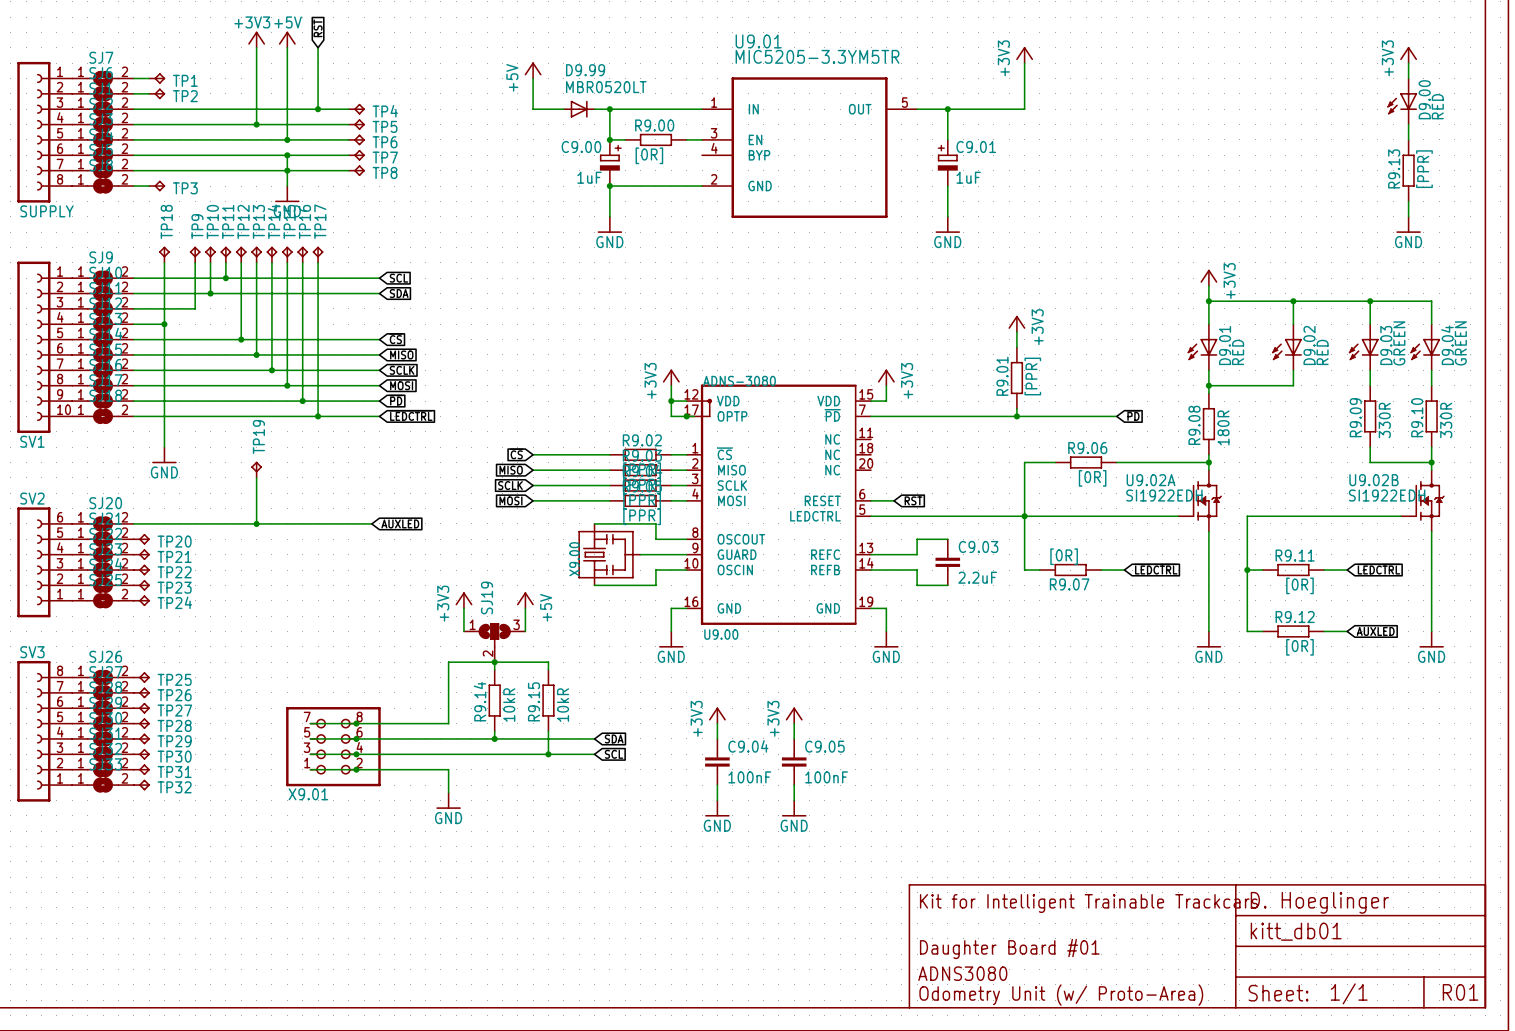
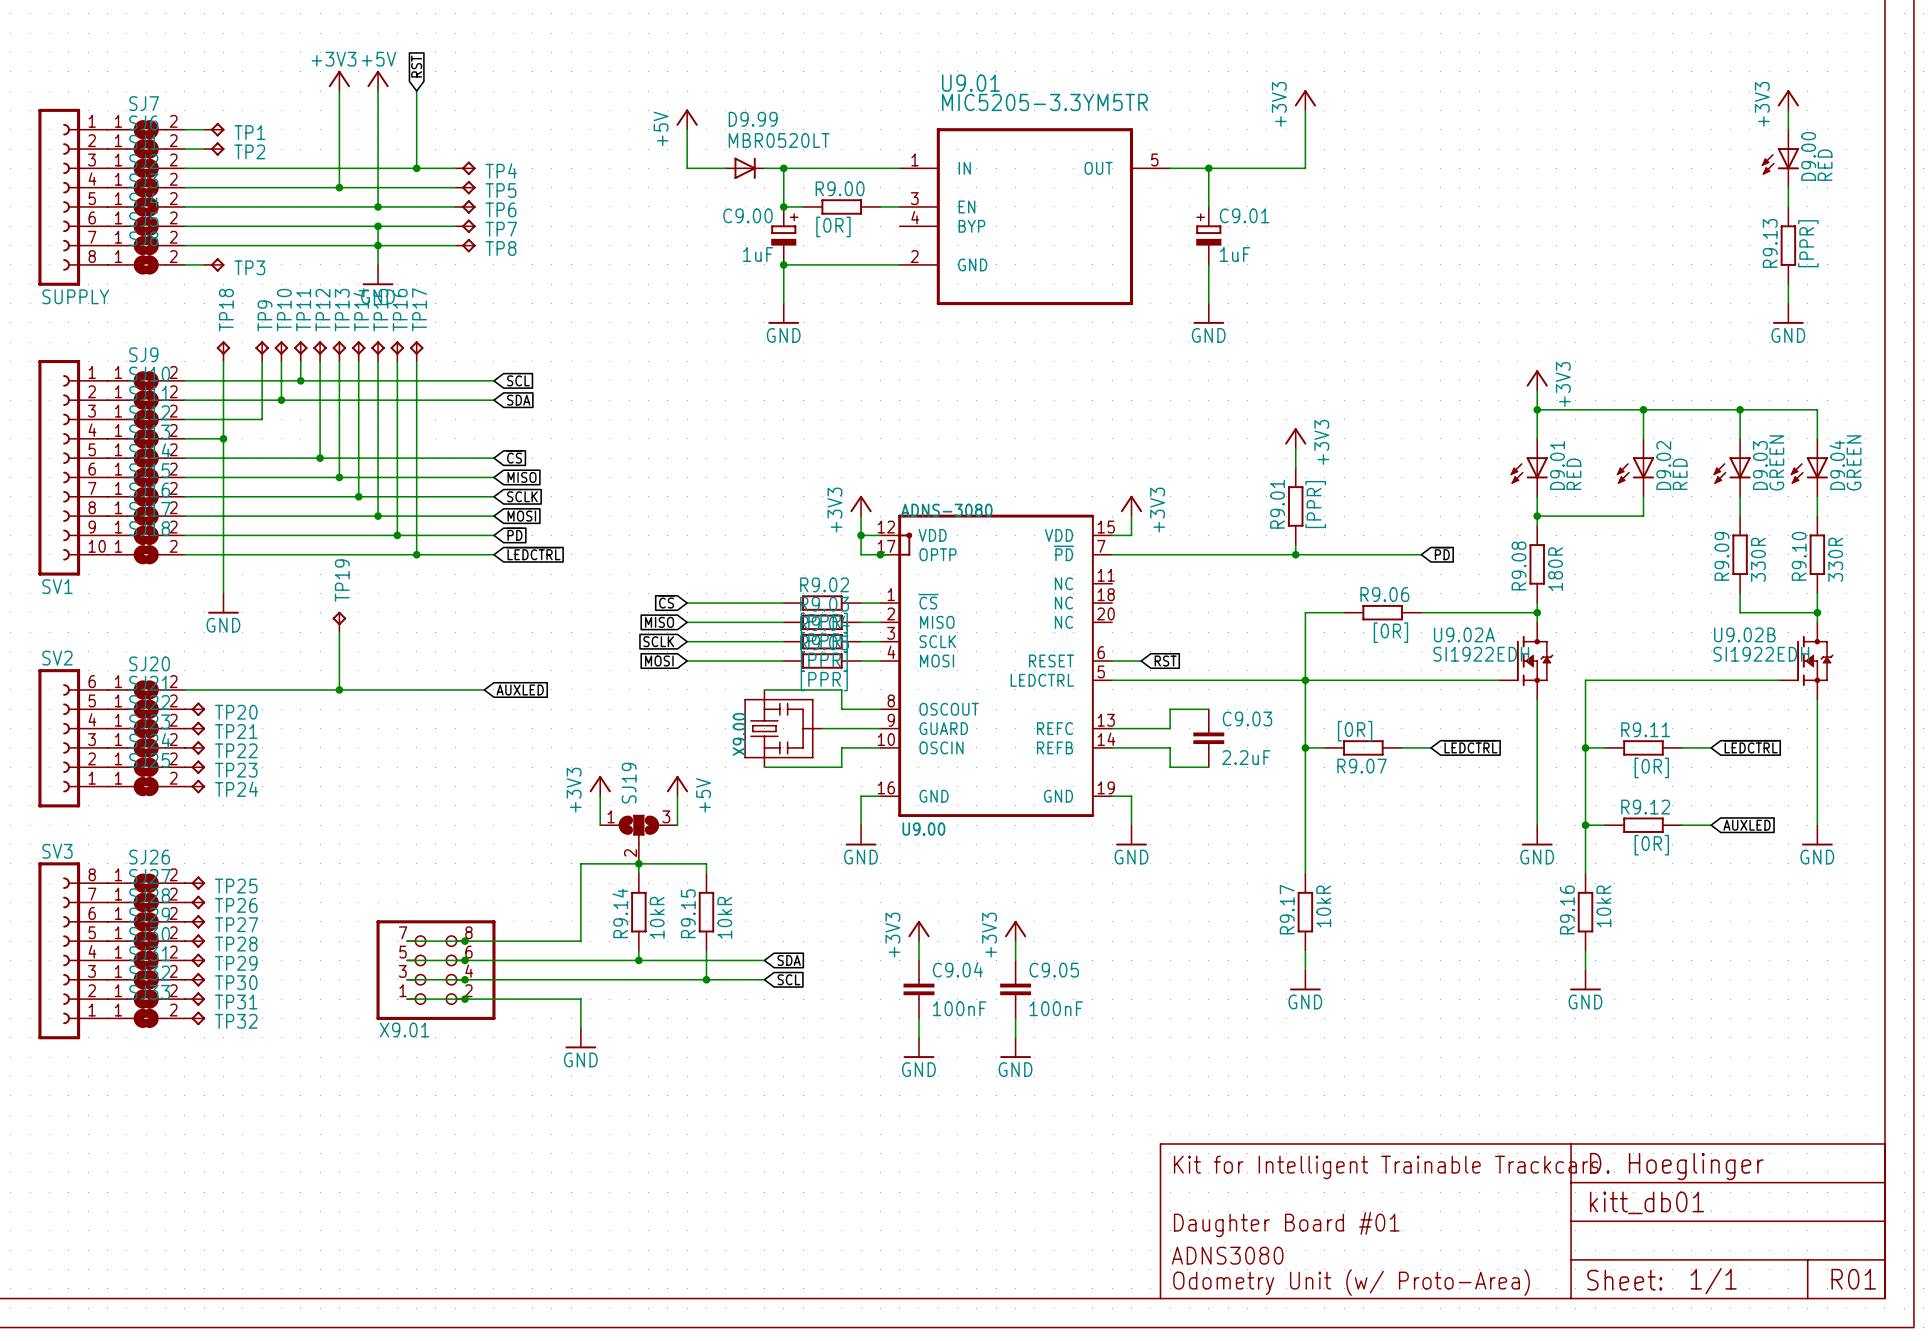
wire: none -> (1305, 747) (1305, 873)
junction: none -> (1305, 747)
wire: none -> (1585, 825) (1585, 873)
junction: none -> (1585, 825)
R9.17: none -> 10kR (1305, 912)
R9.16: none -> 10kR (1585, 912)
wire: none -> (1305, 950) (1305, 970)
wire: none -> (1585, 950) (1585, 970)
power symbol: none -> GND (1305, 980)
power symbol: none -> GND (1585, 980)

